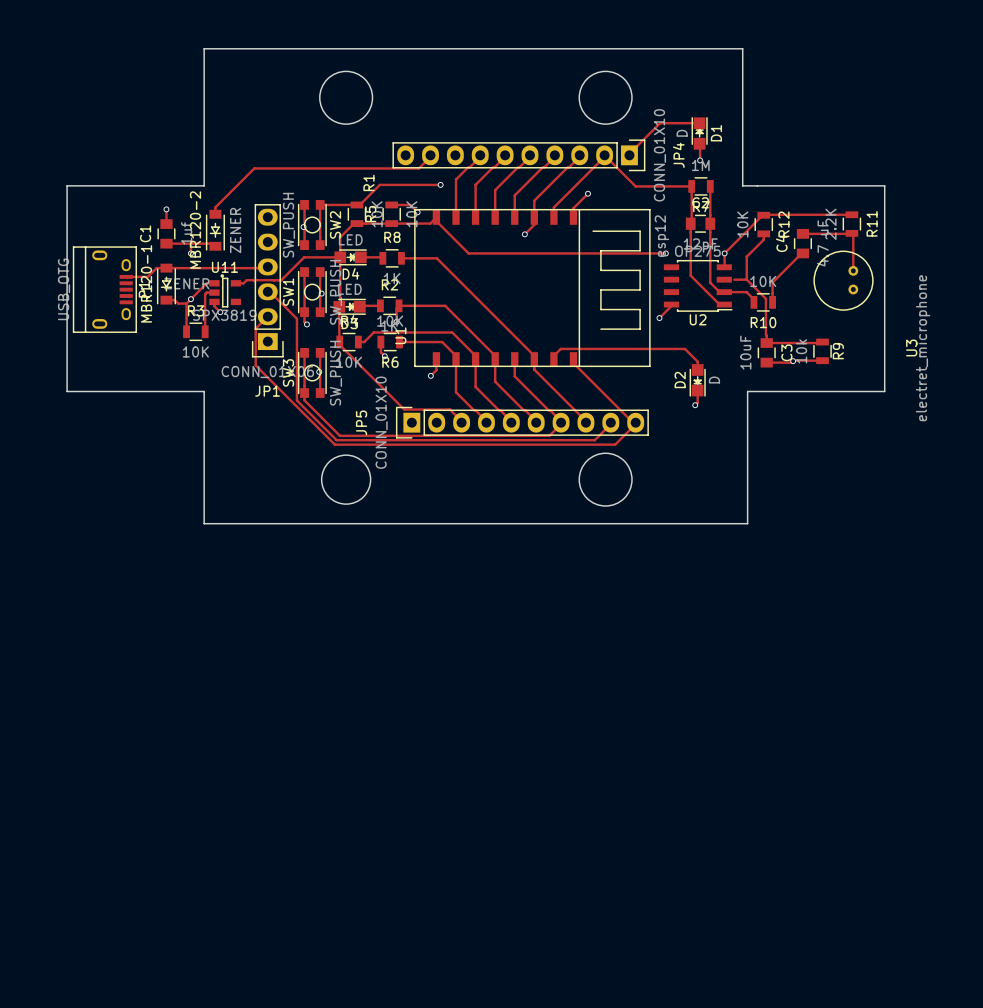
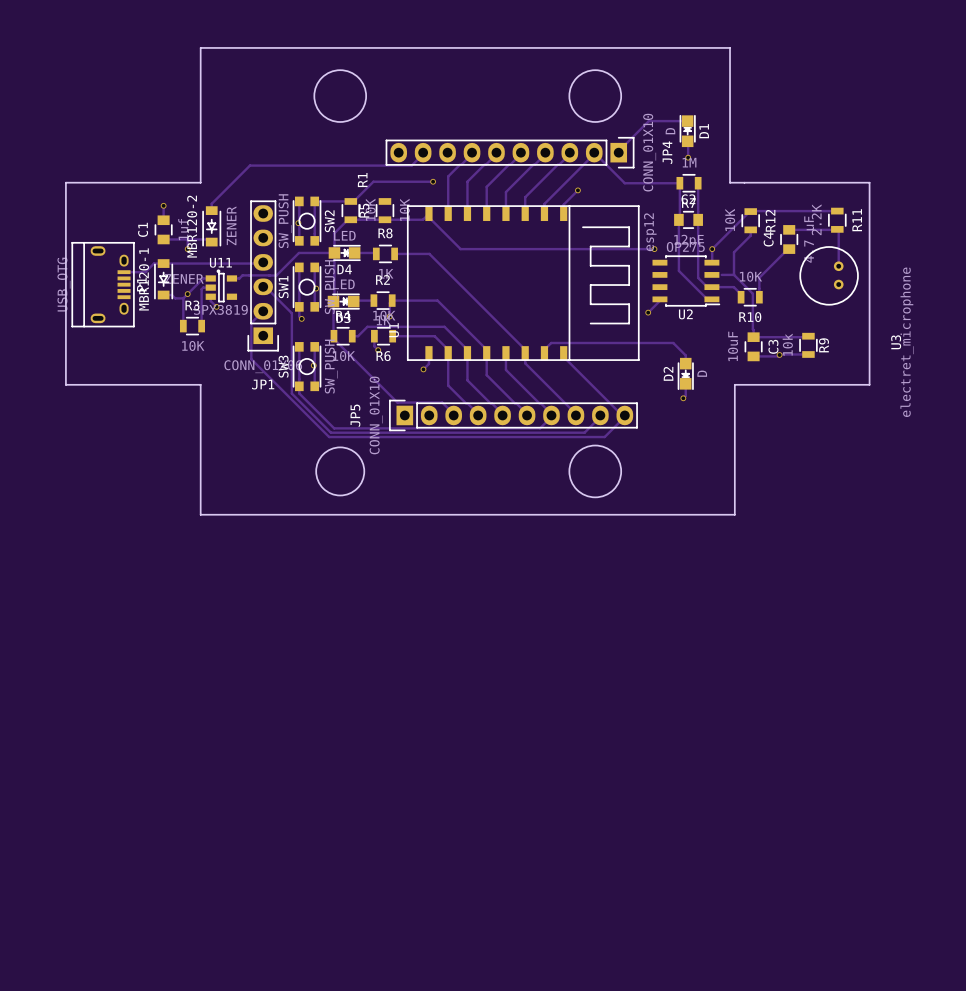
track: (391, 204) (410, 204) (417, 212) -> none
via: (417, 212) -> none
track: (534, 221) (534, 224) (524, 234) -> none
via: (524, 234) -> none

